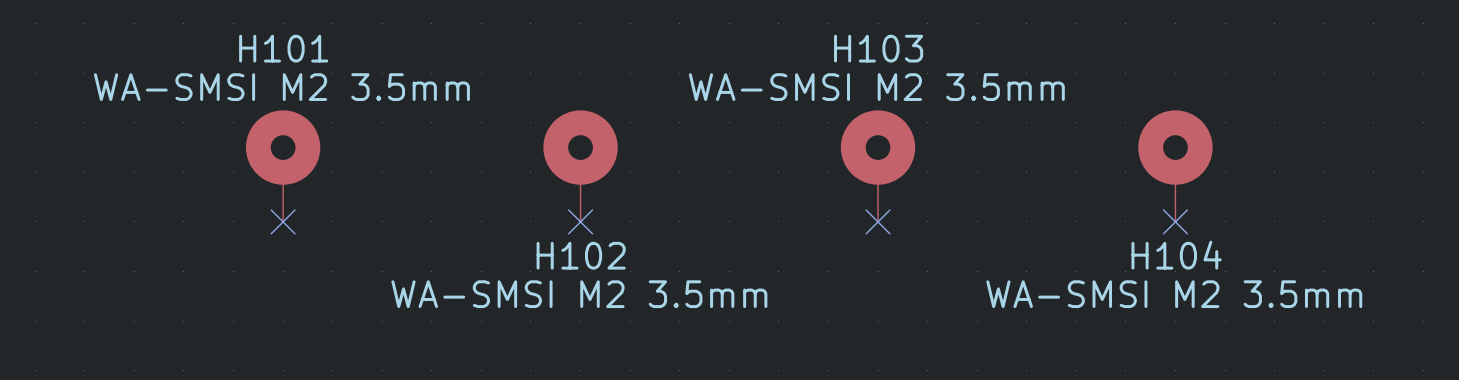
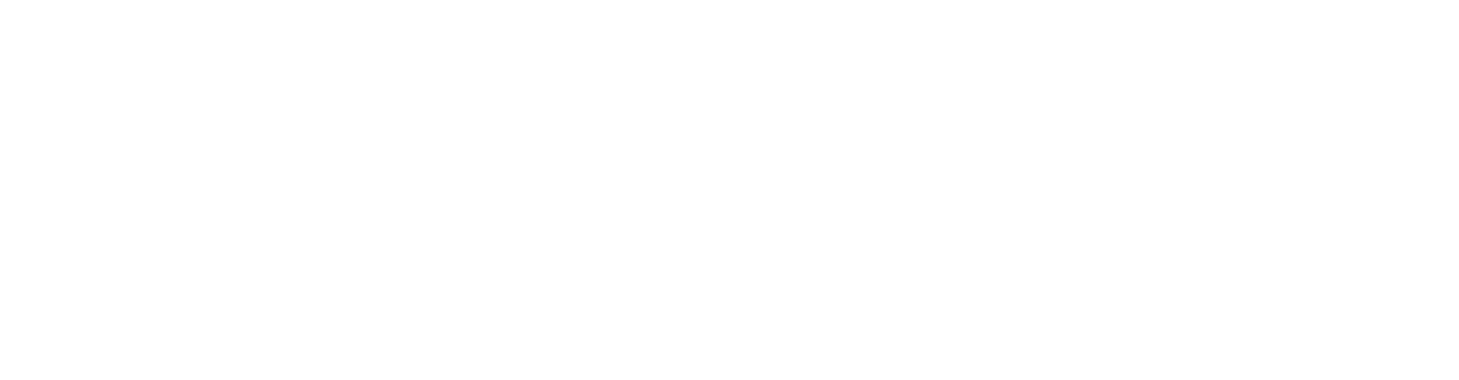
H101: WA-SMSI M2 3.5mm (283, 166) -> none
H102: WA-SMSI M2 3.5mm (580, 166) -> none
H103: WA-SMSI M2 3.5mm (878, 166) -> none
H104: WA-SMSI M2 3.5mm (1175, 166) -> none
no-connect mark: (283, 221) -> none
no-connect mark: (580, 221) -> none
no-connect mark: (878, 221) -> none
no-connect mark: (1175, 221) -> none

